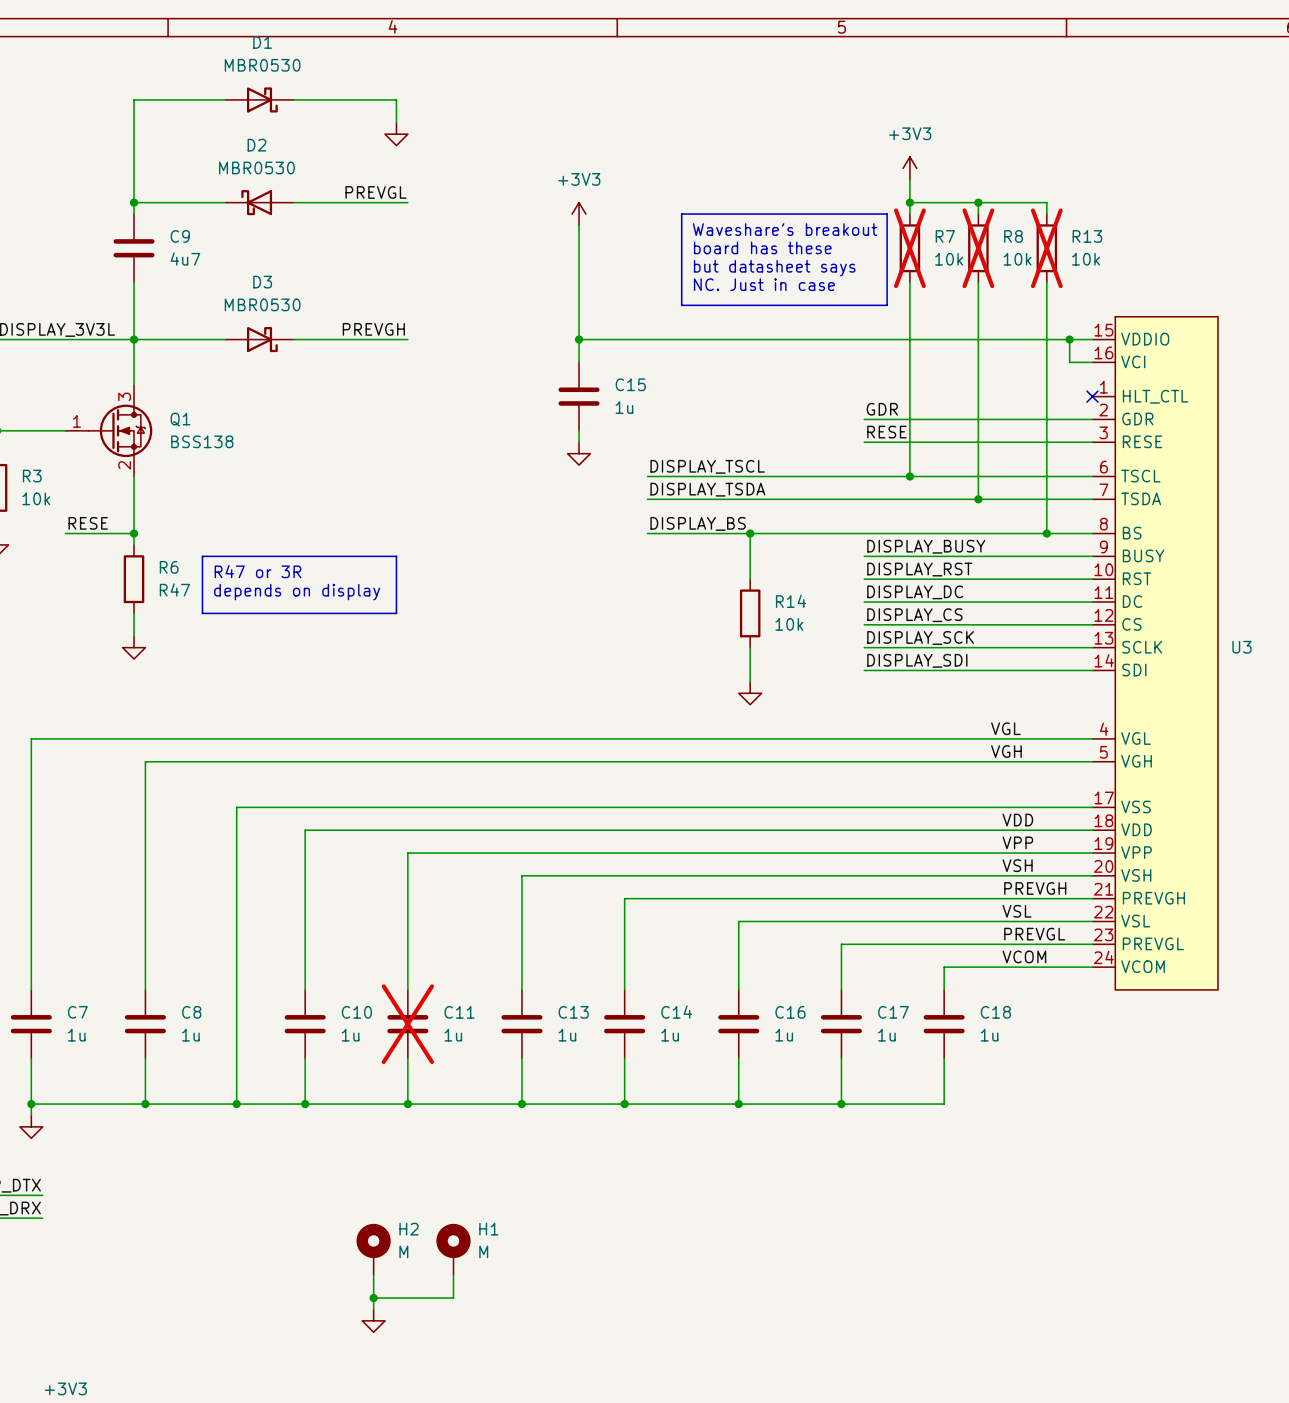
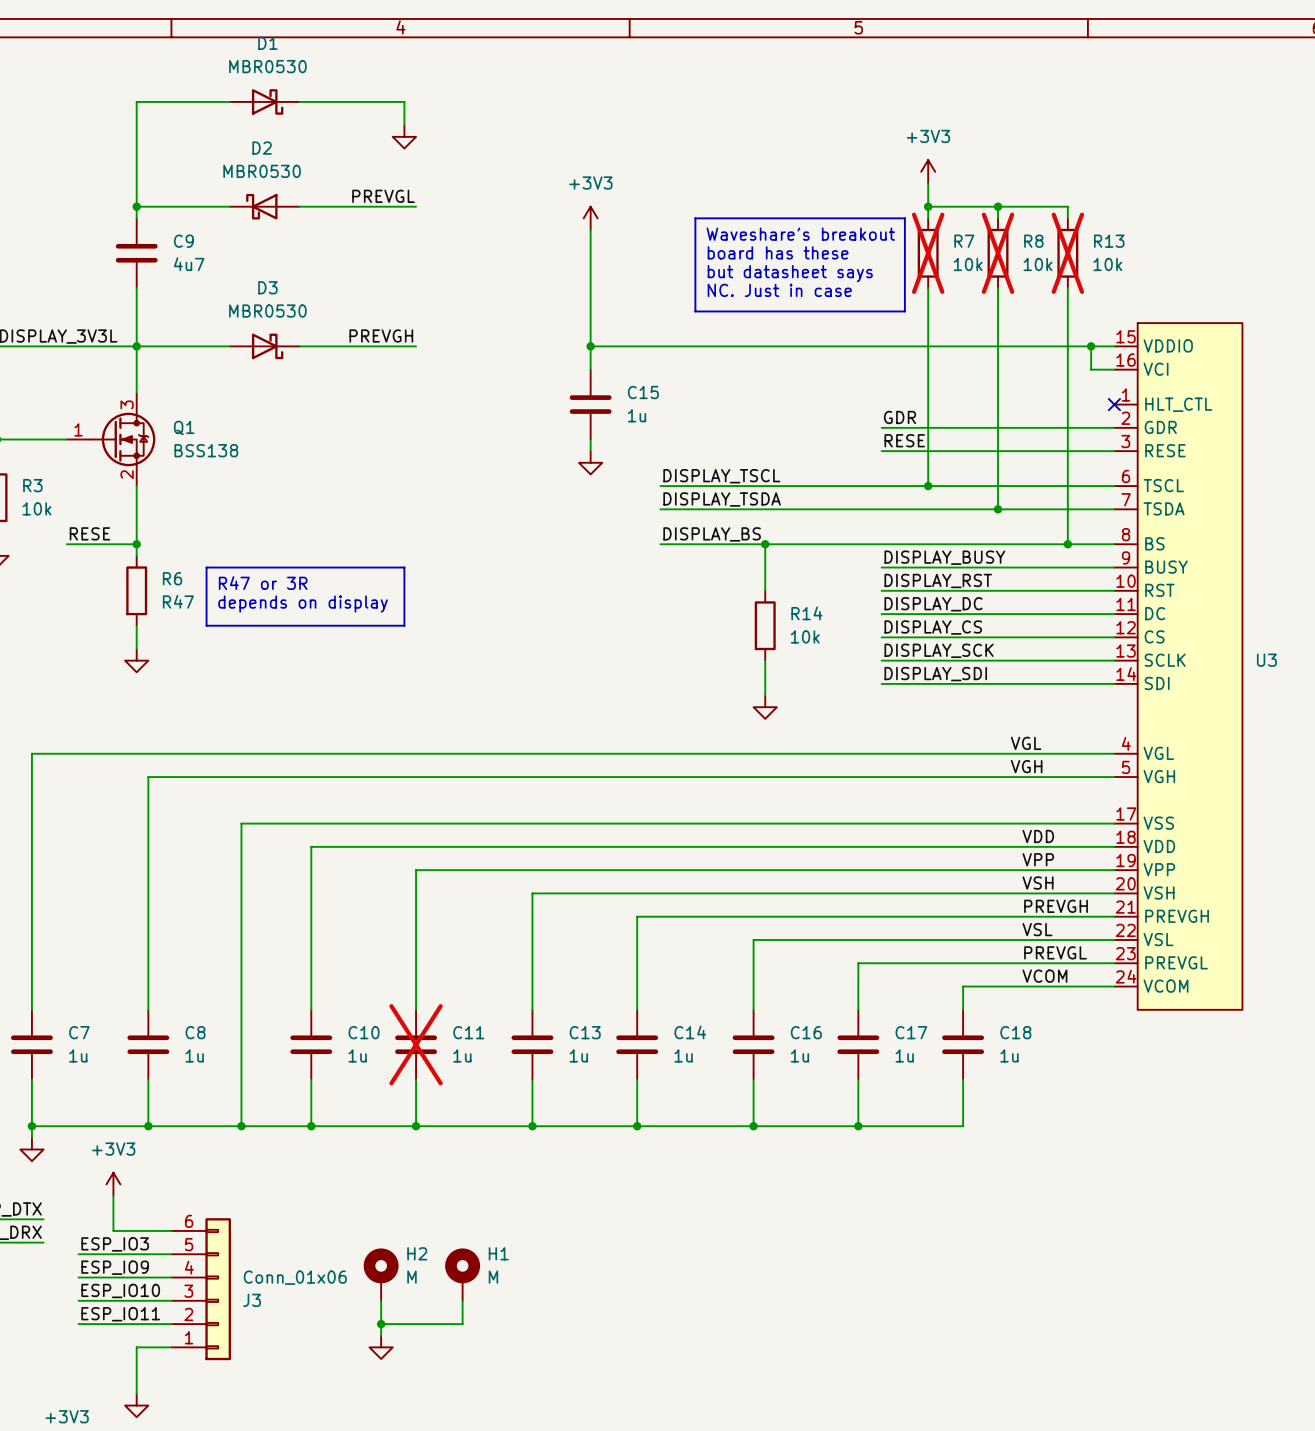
power symbol: none -> +3V3 (113, 1184)
wire: none -> (113, 1196) (113, 1230) (171, 1230)
label: none -> ESP_IO3 (115, 1244)
wire: none -> (78, 1254) (171, 1254)
label: none -> ESP_IO9 (115, 1267)
wire: none -> (78, 1277) (171, 1277)
J3: none -> Conn_01x06 (201, 1289)
label: none -> ESP_IO10 (120, 1290)
wire: none -> (78, 1300) (171, 1300)
label: none -> ESP_IO11 (120, 1314)
wire: none -> (78, 1324) (171, 1324)
wire: none -> (171, 1347) (136, 1347) (136, 1393)
power symbol: none -> (136, 1405)

